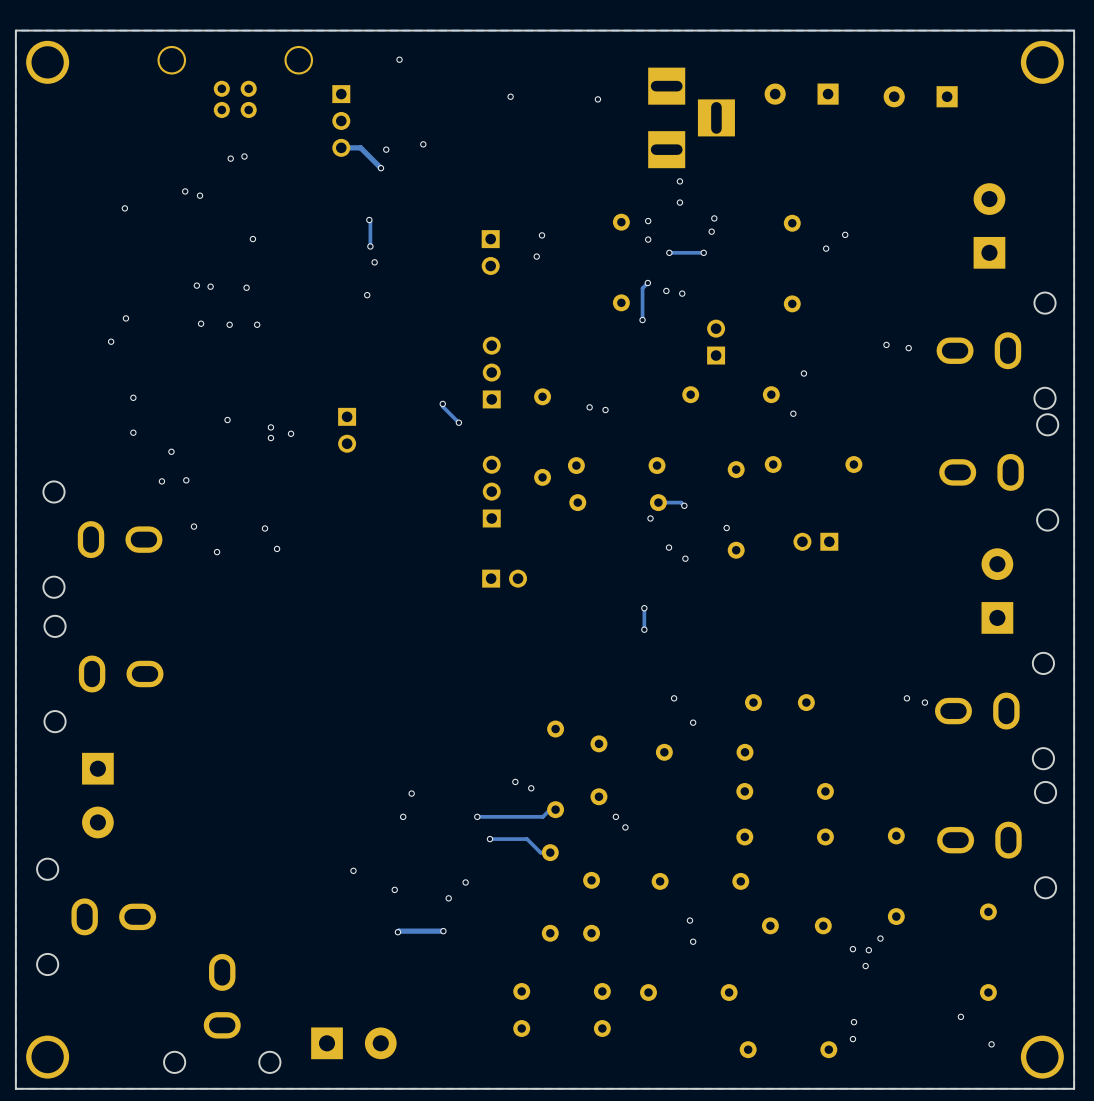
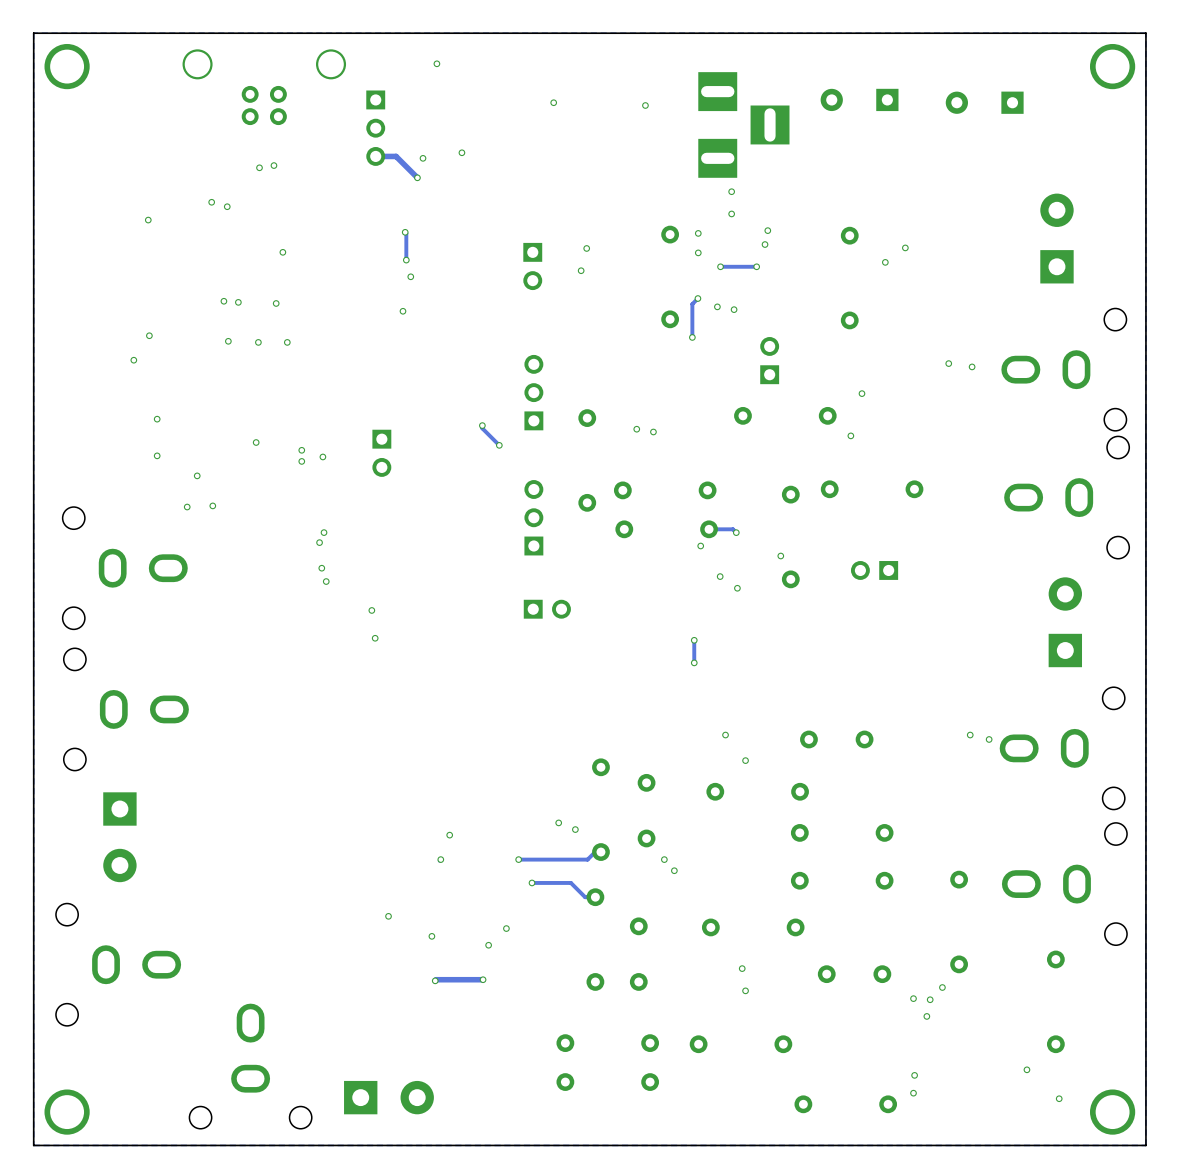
via: none -> (324, 532)
via: none -> (319, 542)
via: (193, 526) -> none
via: (264, 528) -> none
via: none -> (321, 568)
via: (277, 548) -> none
via: (217, 552) -> none
via: none -> (326, 581)
via: none -> (371, 610)
via: none -> (375, 638)

